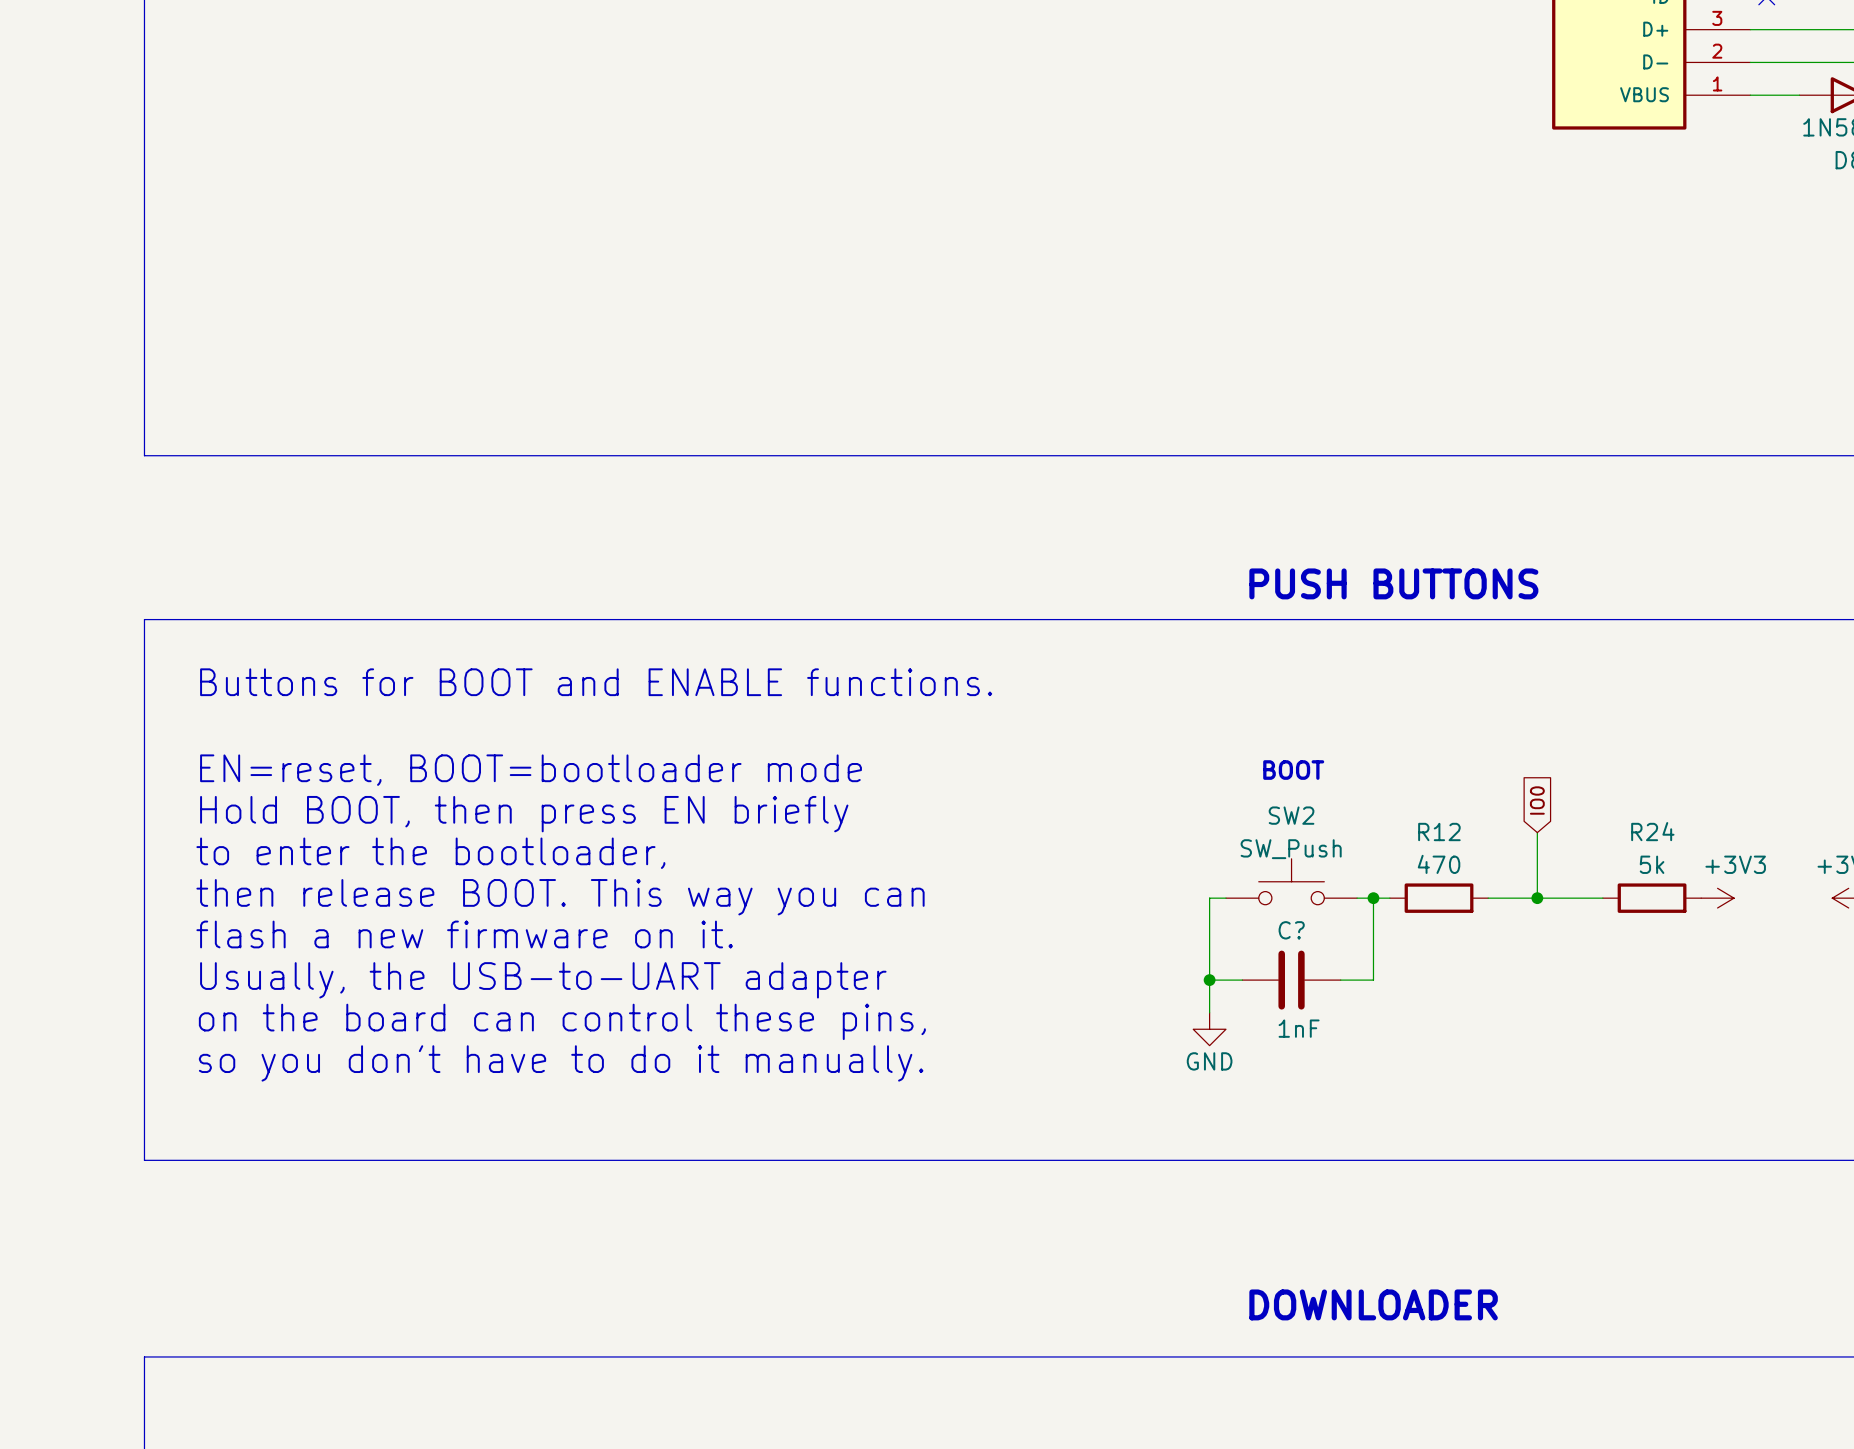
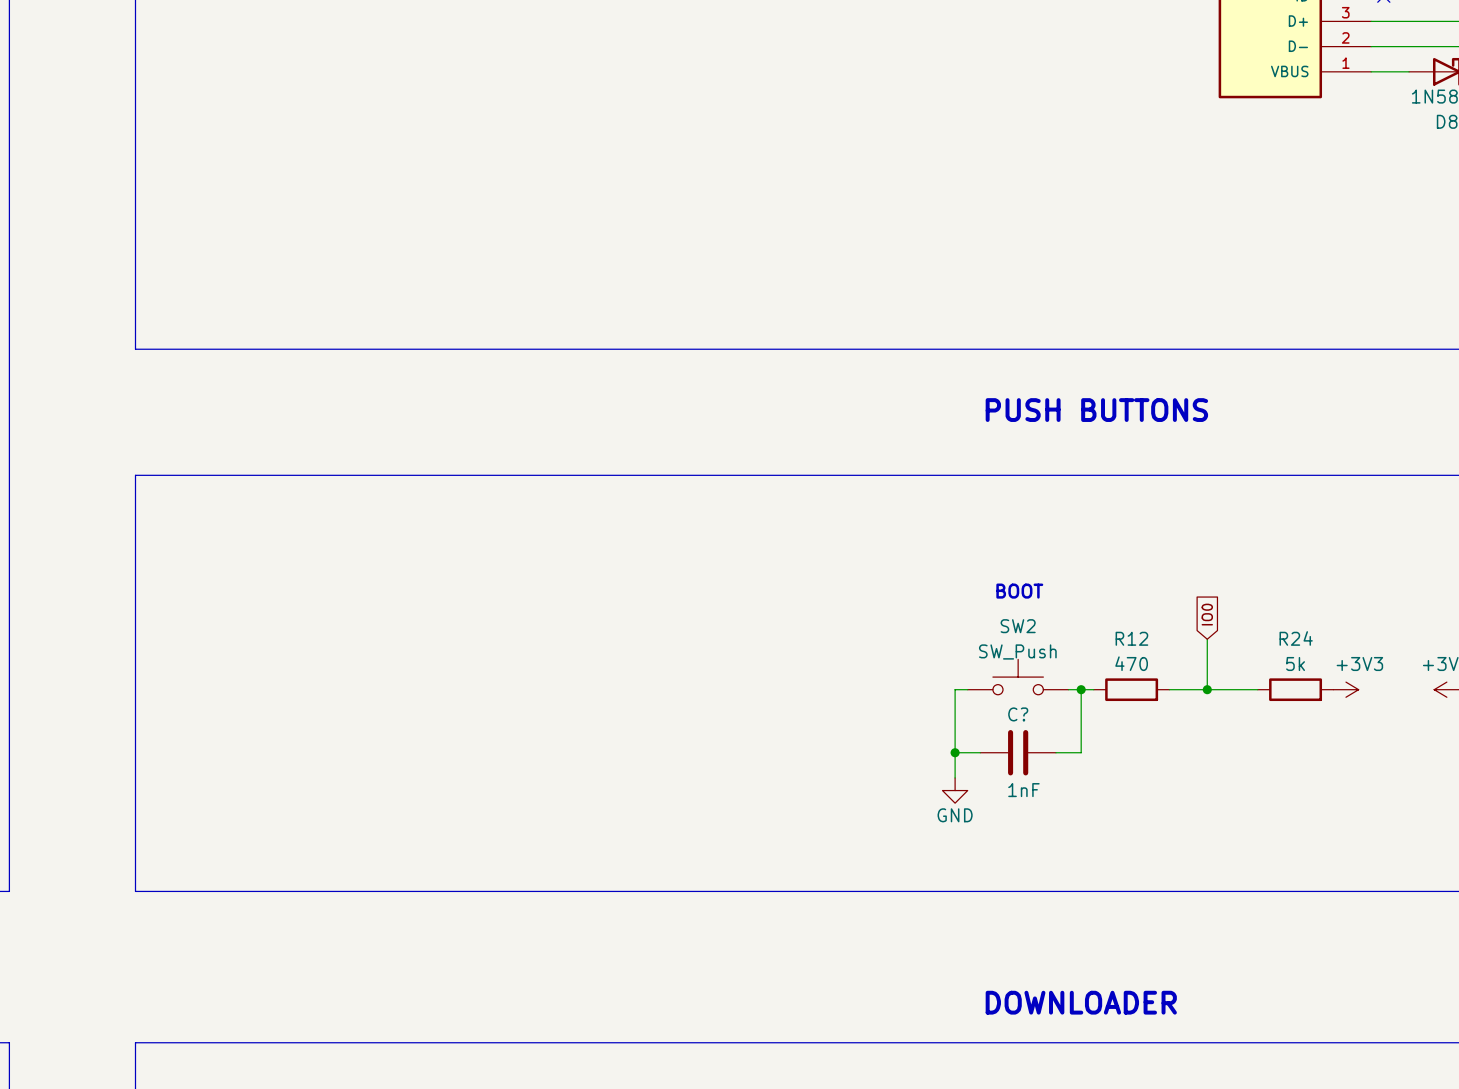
text position: PUSH BUTTONS (1393, 583) -> PUSH BUTTONS (1096, 410)
text: Buttons for BOOT and ENABLE functions. (596, 682) -> none
text: EN=reset, BOOT=bootloader mode (531, 770) -> none
text: Hold BOOT, then press EN briefly (524, 814) -> none
text: to enter the bootloader, (430, 853) -> none
text: then release BOOT. This way you can (560, 897) -> none
text: flash a new firmware on it. (464, 934) -> none
text: Usually, the USB-to-UART adapter (543, 980) -> none
text: on the board can control these pins, (562, 1021) -> none
text: so you don't have to do it manually. (561, 1063) -> none

